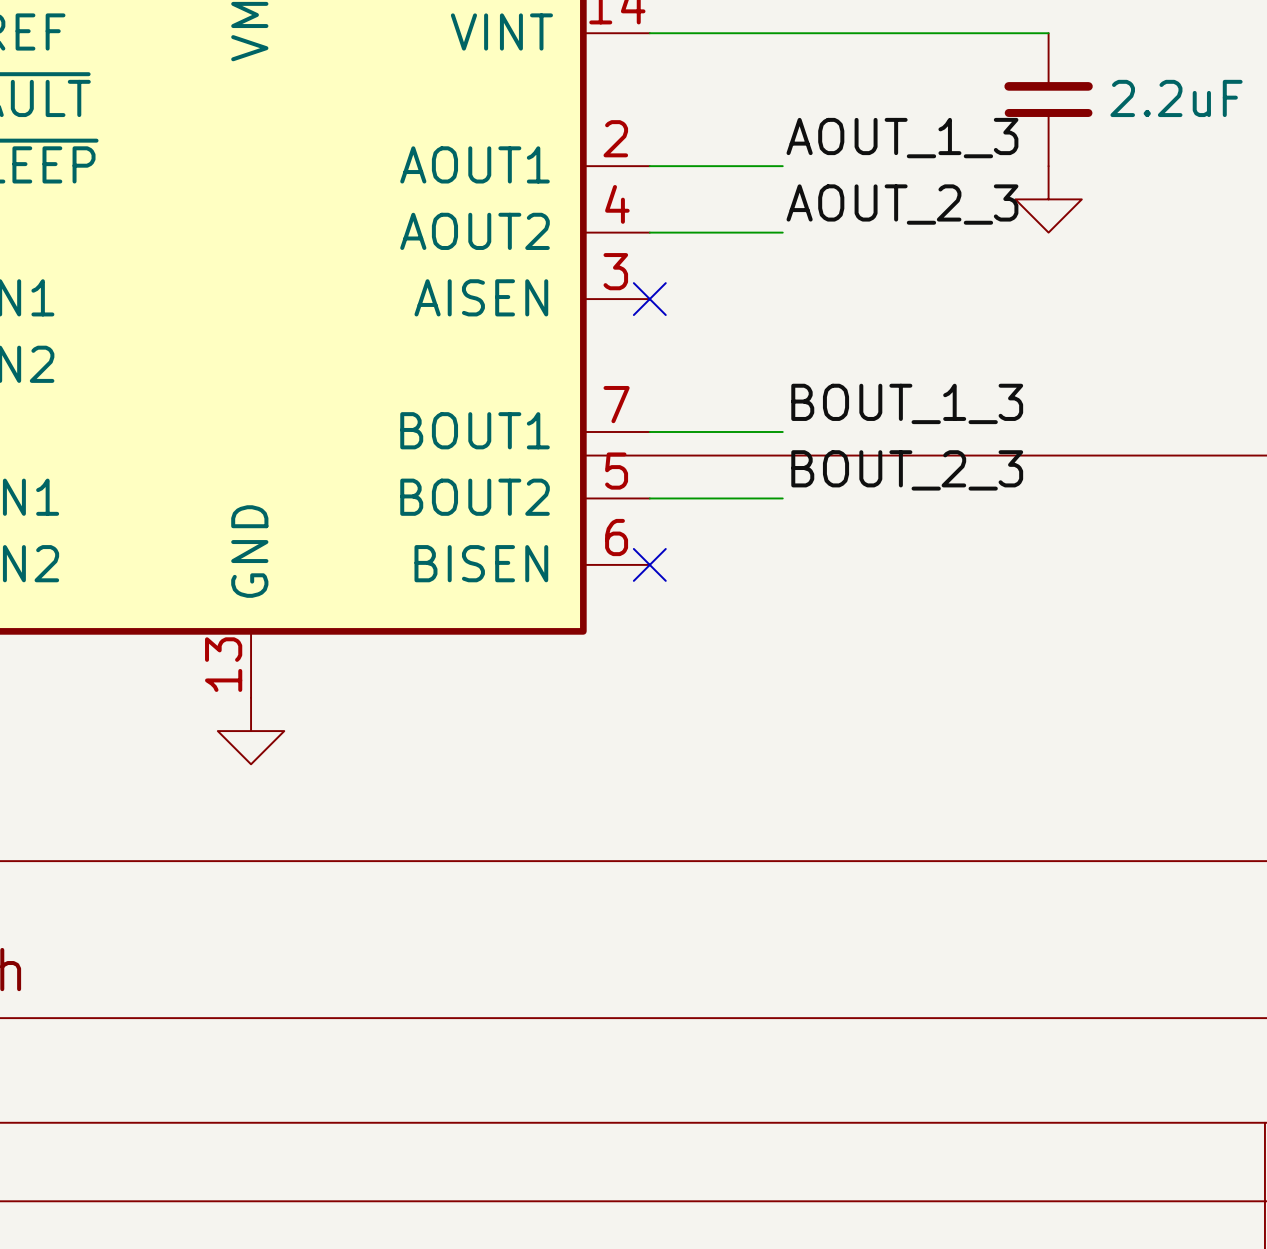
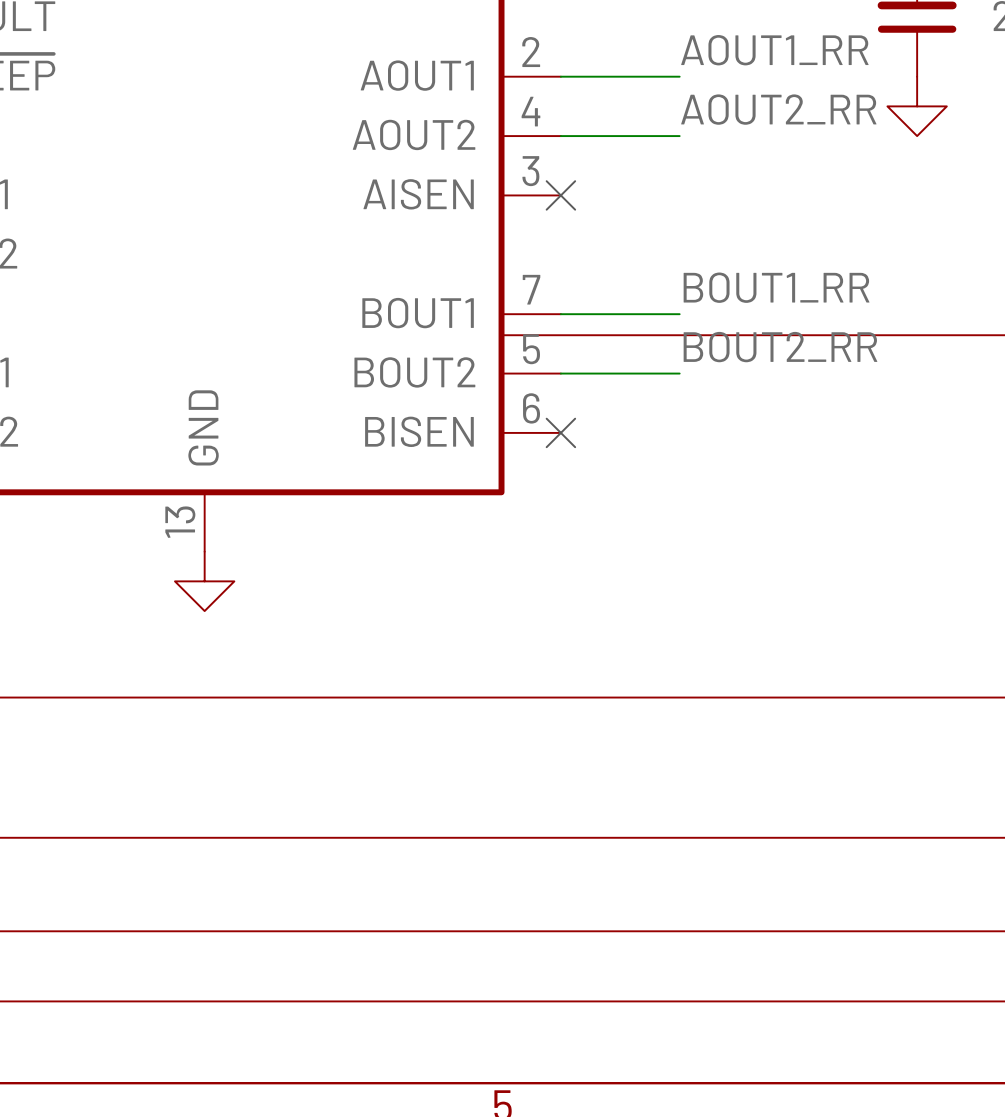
label: AOUT_1_3 (902, 138) -> AOUT1_RR (774, 50)
label: AOUT_2_3 (902, 204) -> AOUT2_RR (778, 109)
label: BOUT_1_3 (907, 403) -> BOUT1_RR (776, 287)
label: BOUT_2_3 (907, 470) -> BOUT2_RR (780, 347)

